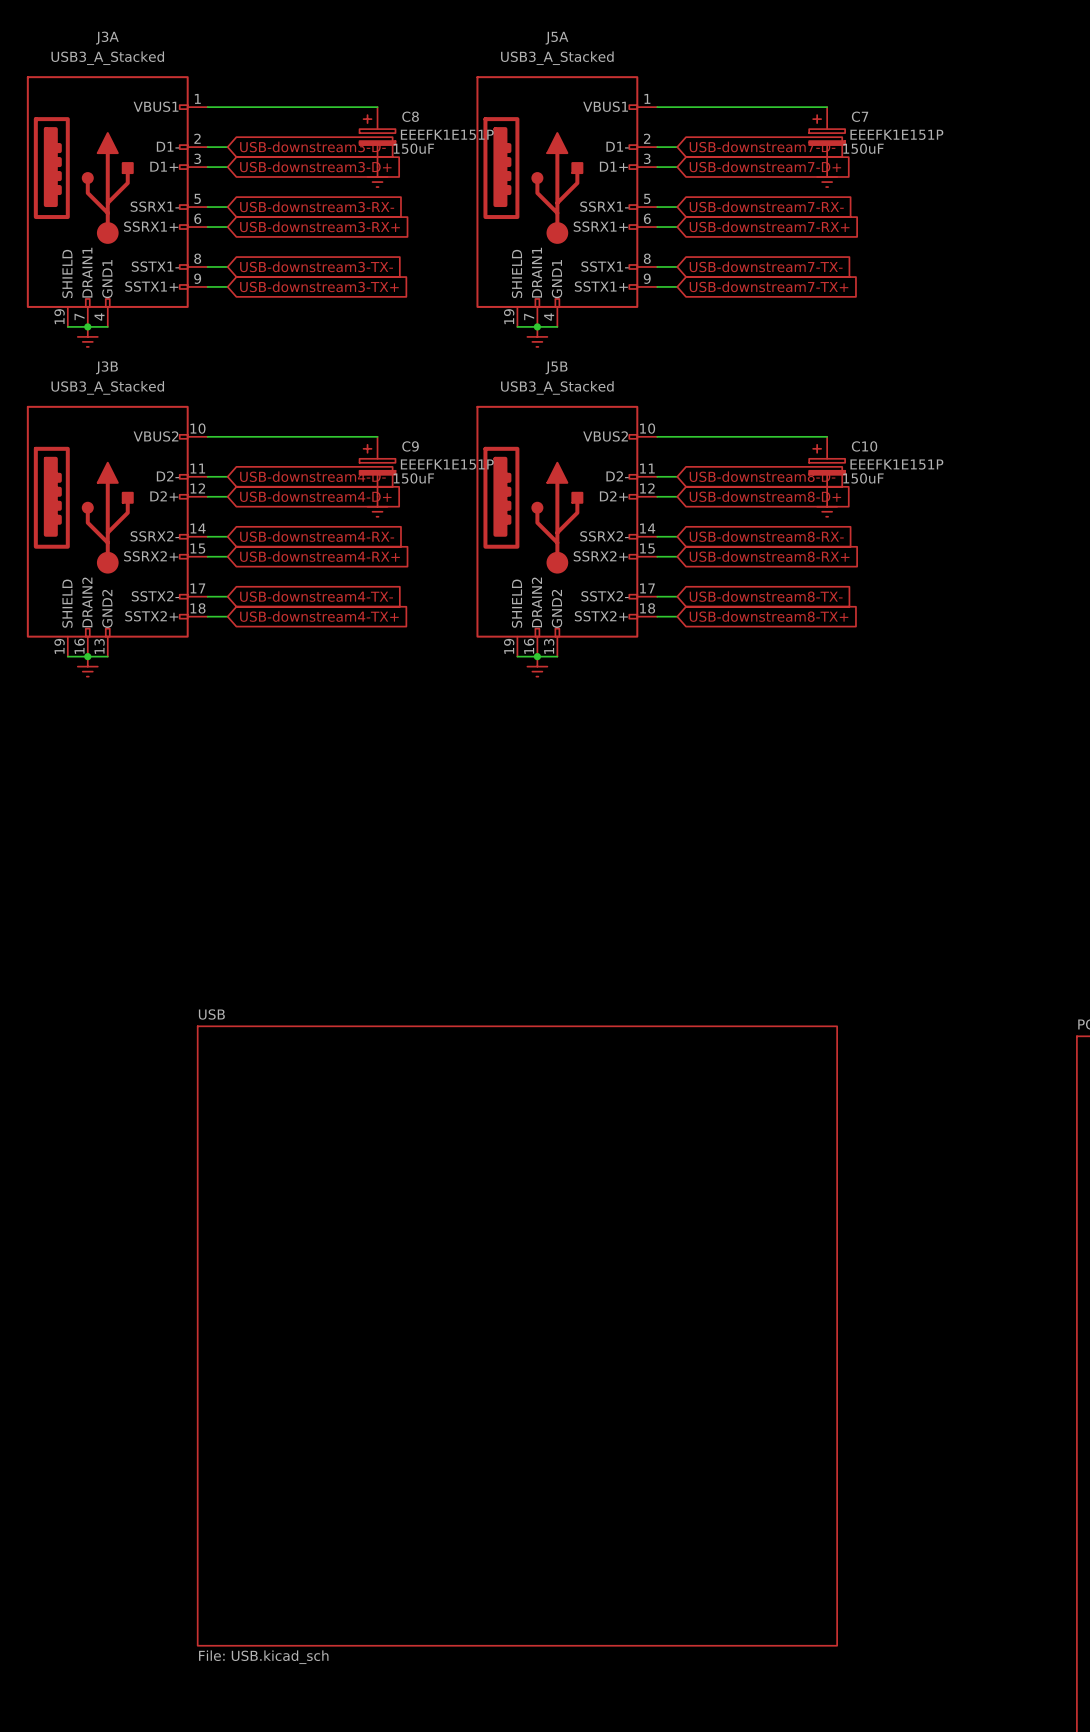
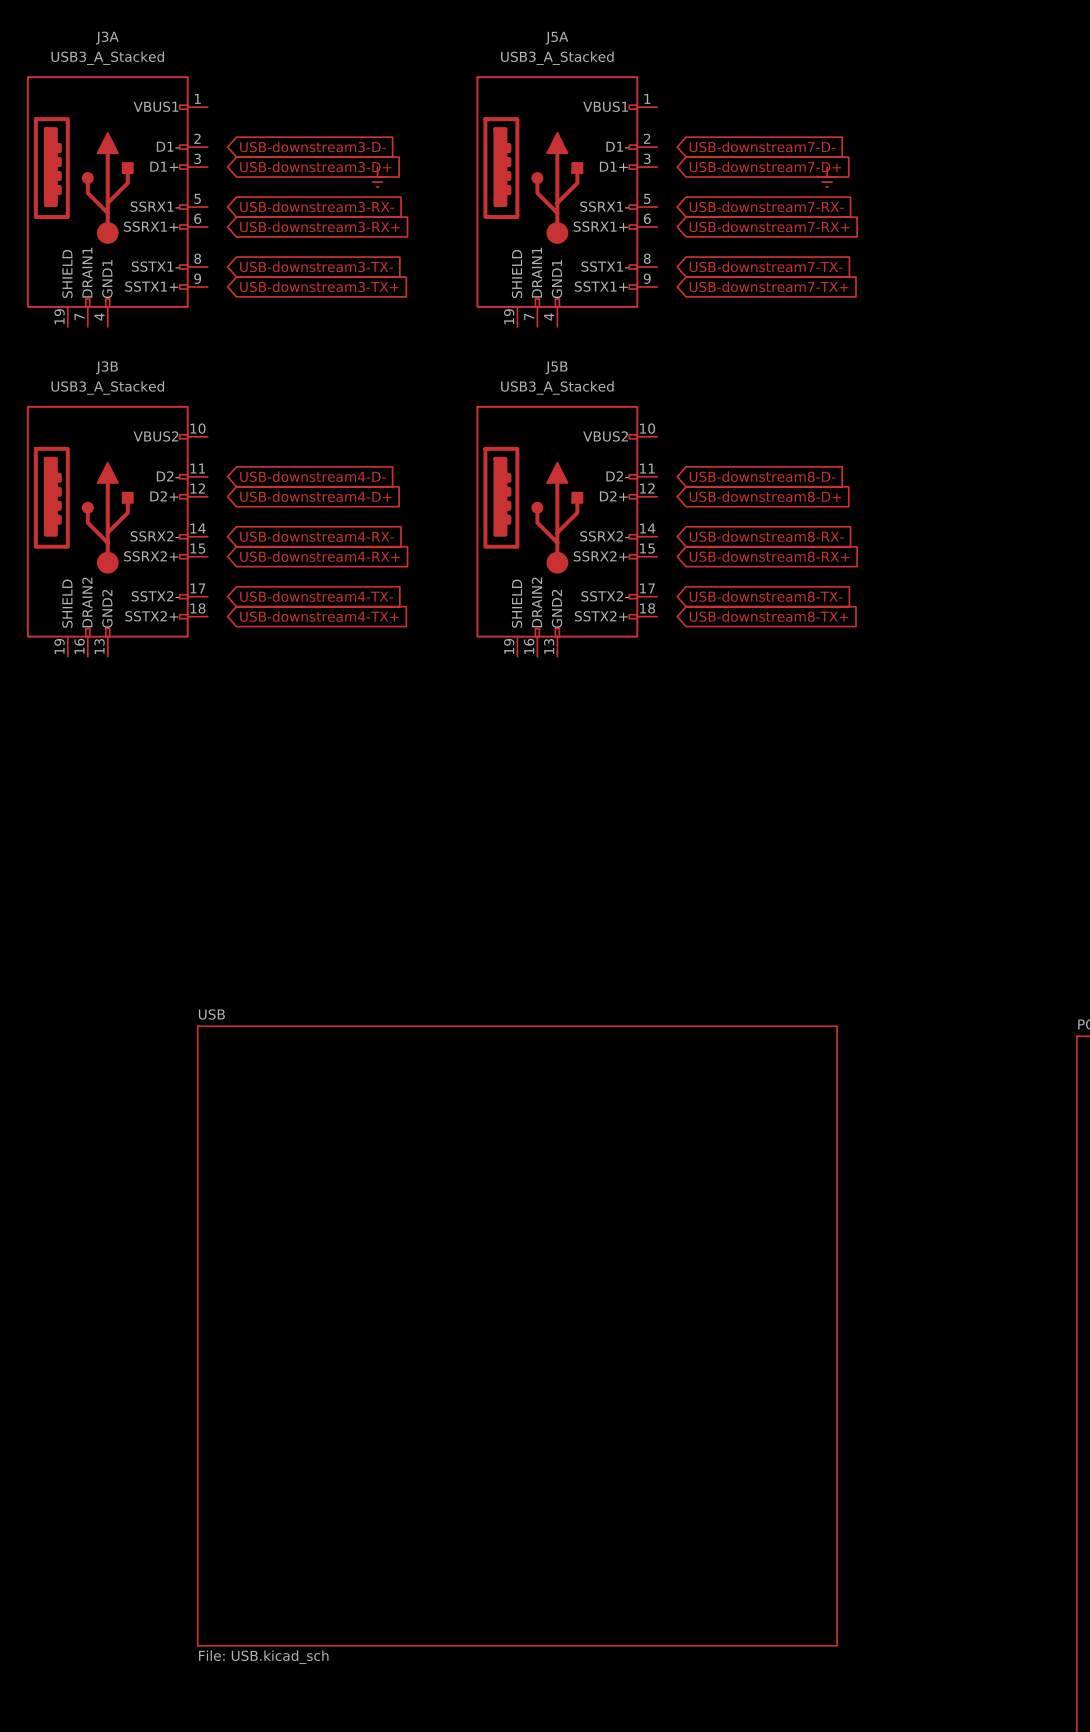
wire: (207, 107) (377, 107) -> none
wire: (657, 107) (827, 107) -> none
C8: EEEFK1E151P (377, 137) -> none
C7: EEEFK1E151P (827, 137) -> none
wire: (207, 147) (227, 147) -> none
wire: (657, 147) (677, 147) -> none
wire: (207, 167) (227, 167) -> none
wire: (657, 167) (677, 167) -> none
wire: (207, 207) (227, 207) -> none
wire: (657, 207) (677, 207) -> none
wire: (207, 227) (227, 227) -> none
wire: (657, 227) (677, 227) -> none
wire: (207, 266) (227, 266) -> none
wire: (657, 266) (677, 266) -> none
wire: (207, 286) (227, 286) -> none
wire: (657, 286) (677, 286) -> none
wire: (67, 326) (107, 326) -> none
junction: (87, 326) -> none
wire: (517, 326) (557, 326) -> none
junction: (537, 326) -> none
power symbol: (87, 336) -> none
power symbol: (537, 336) -> none
wire: (207, 436) (377, 436) -> none
wire: (657, 436) (827, 436) -> none
C9: EEEFK1E151P (377, 466) -> none
C10: EEEFK1E151P (827, 466) -> none
wire: (207, 476) (227, 476) -> none
wire: (657, 476) (677, 476) -> none
wire: (207, 496) (227, 496) -> none
wire: (657, 496) (677, 496) -> none
power symbol: (377, 506) -> none
power symbol: (827, 506) -> none
wire: (207, 536) (227, 536) -> none
wire: (657, 536) (677, 536) -> none
wire: (207, 556) (227, 556) -> none
wire: (657, 556) (677, 556) -> none
wire: (207, 596) (227, 596) -> none
wire: (657, 596) (677, 596) -> none
wire: (207, 616) (227, 616) -> none
wire: (657, 616) (677, 616) -> none
wire: (67, 656) (107, 656) -> none
junction: (87, 656) -> none
wire: (517, 656) (557, 656) -> none
junction: (537, 656) -> none
power symbol: (87, 666) -> none
power symbol: (537, 666) -> none

